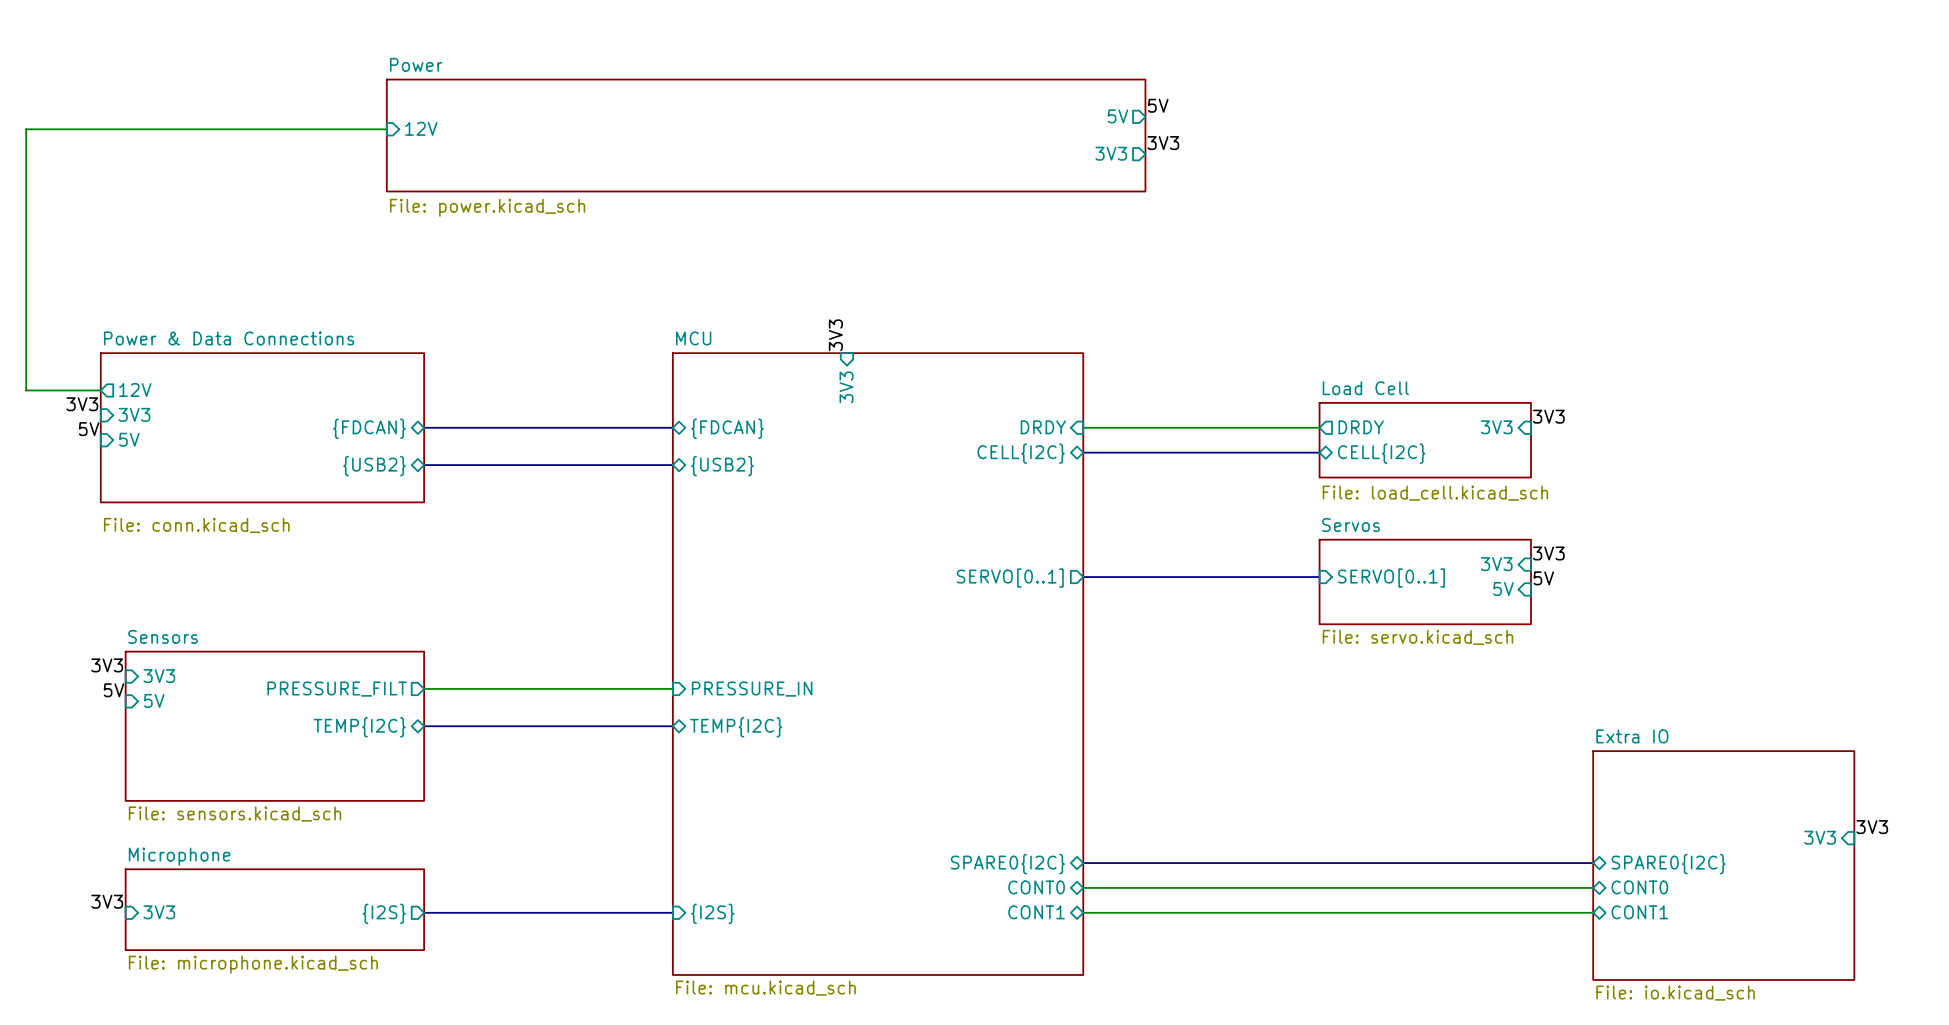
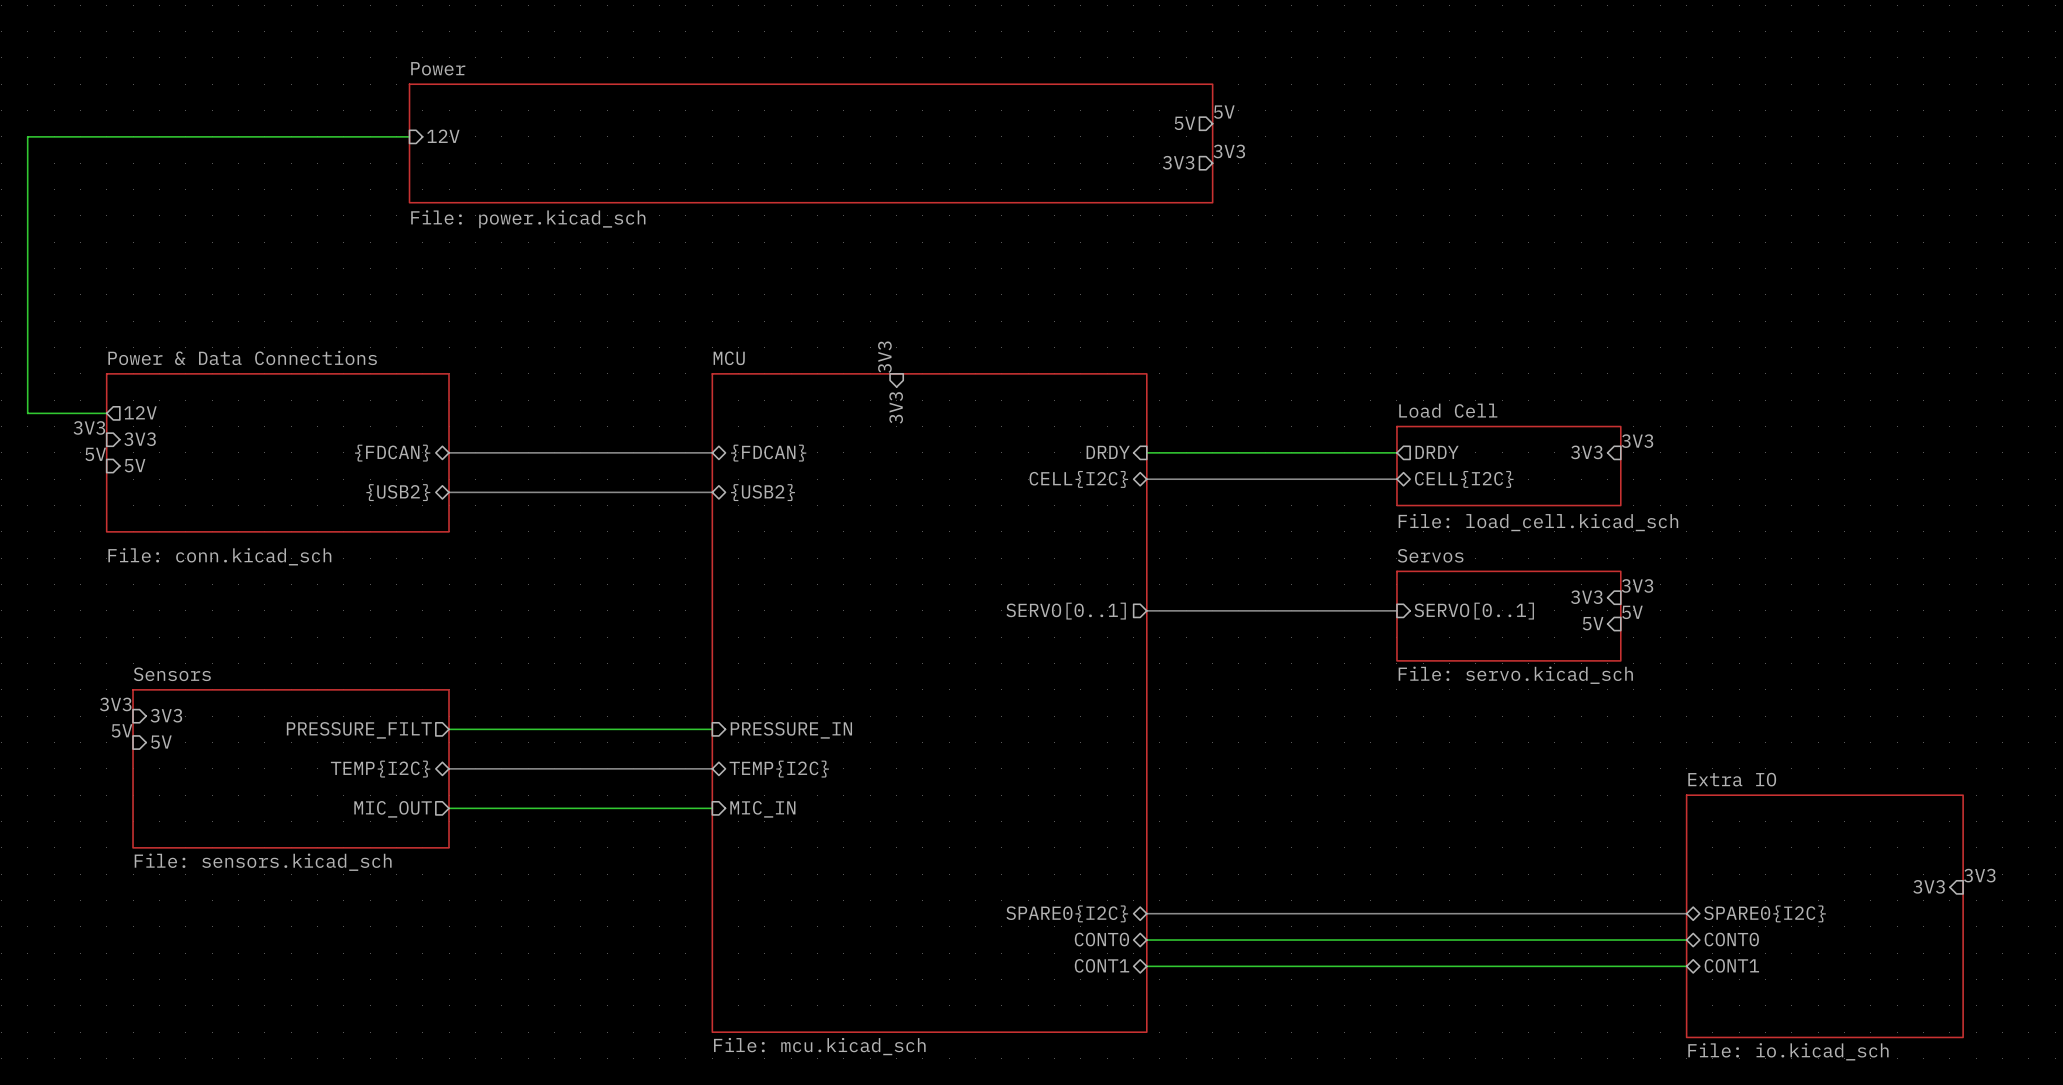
sheet pin: none -> MIC_OUT (393, 809)
wire: none -> (449, 808) (712, 808)
sheet pin: none -> MIC_IN (762, 809)
label: 3V3 (107, 901) -> none
sheet Microphone: File: microphone.kicad_sch (274, 909) -> none
sheet pin: 3V3 (159, 912) -> none
bus: (424, 912) (672, 912) -> none
sheet pin: {I2S} (384, 913) -> none
sheet pin: {I2S} (712, 913) -> none

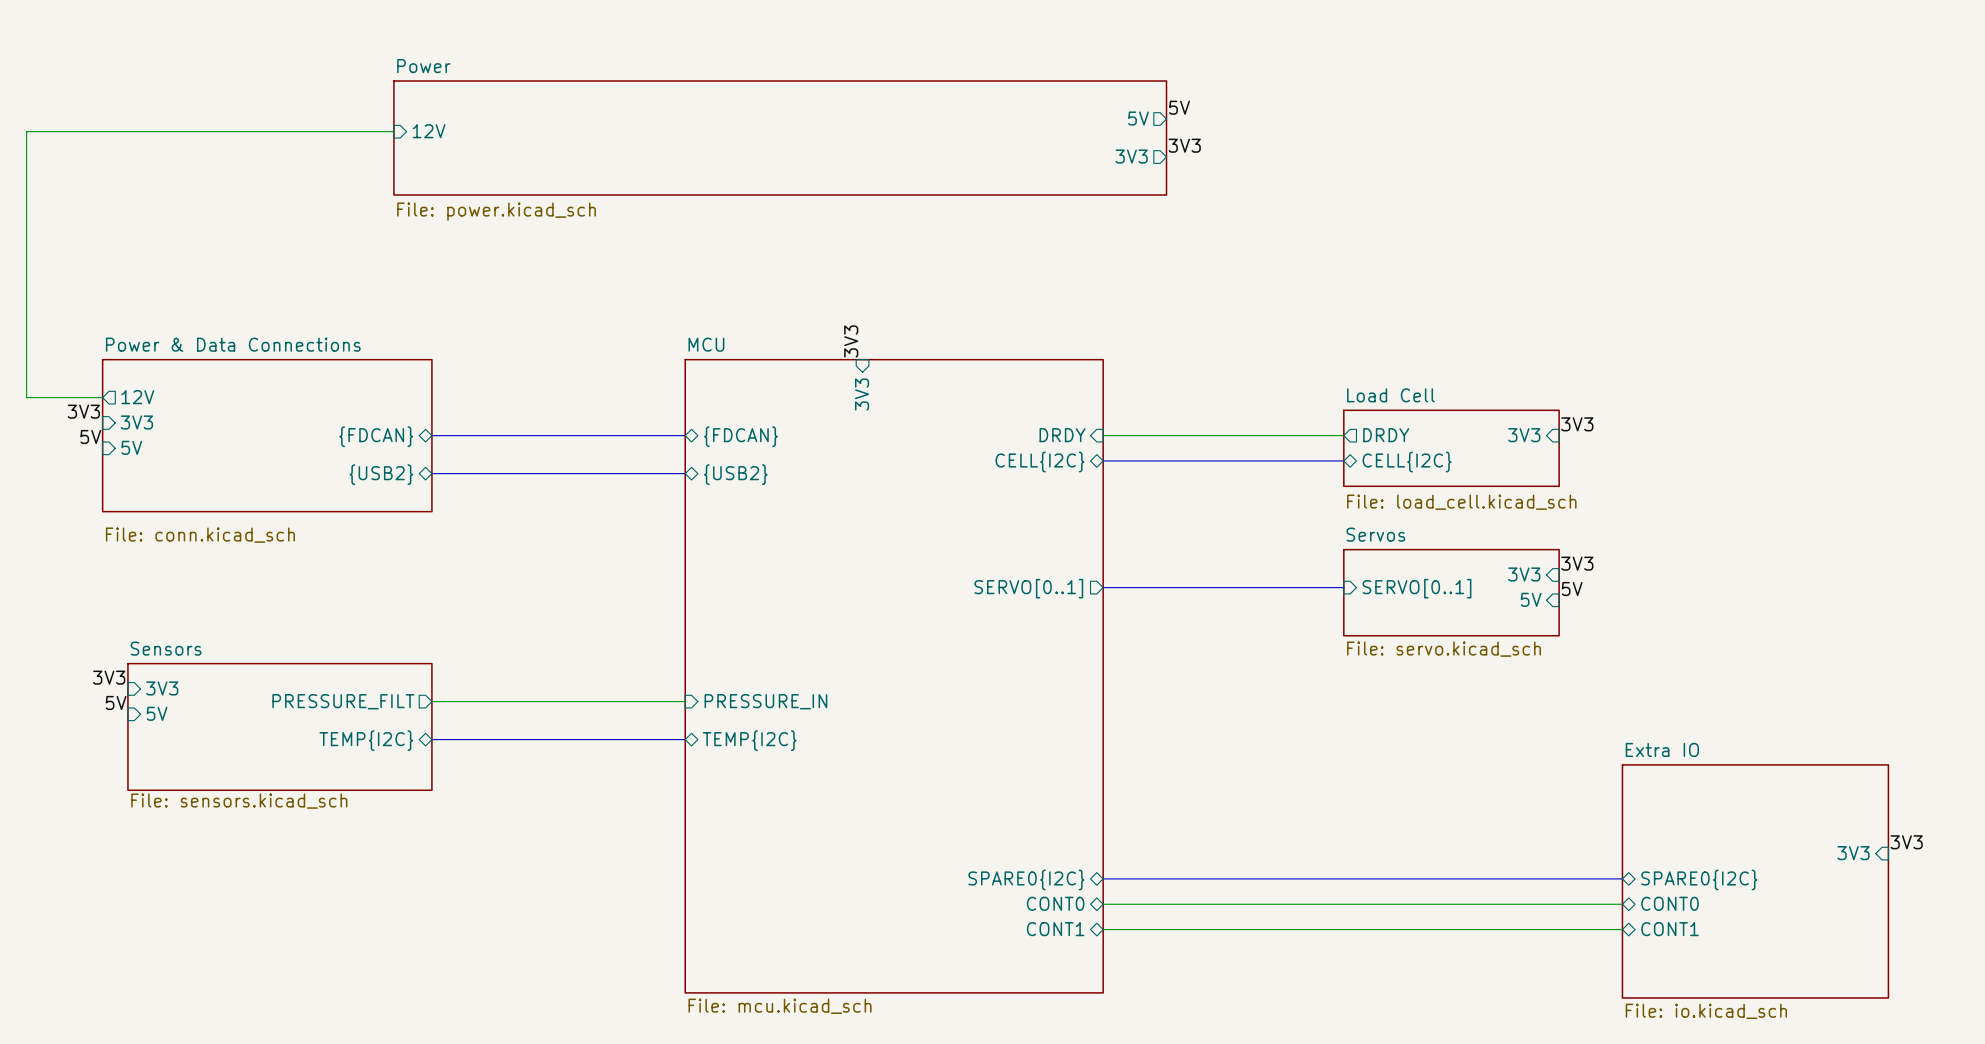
sheet Sensors: none -> File: sensors.kicad_sch (279, 726)
sheet Sensors: File: sensors.kicad_sch (291, 768) -> none
wire: (449, 808) (712, 808) -> none
sheet pin: MIC_OUT (393, 809) -> none
sheet pin: MIC_IN (762, 809) -> none

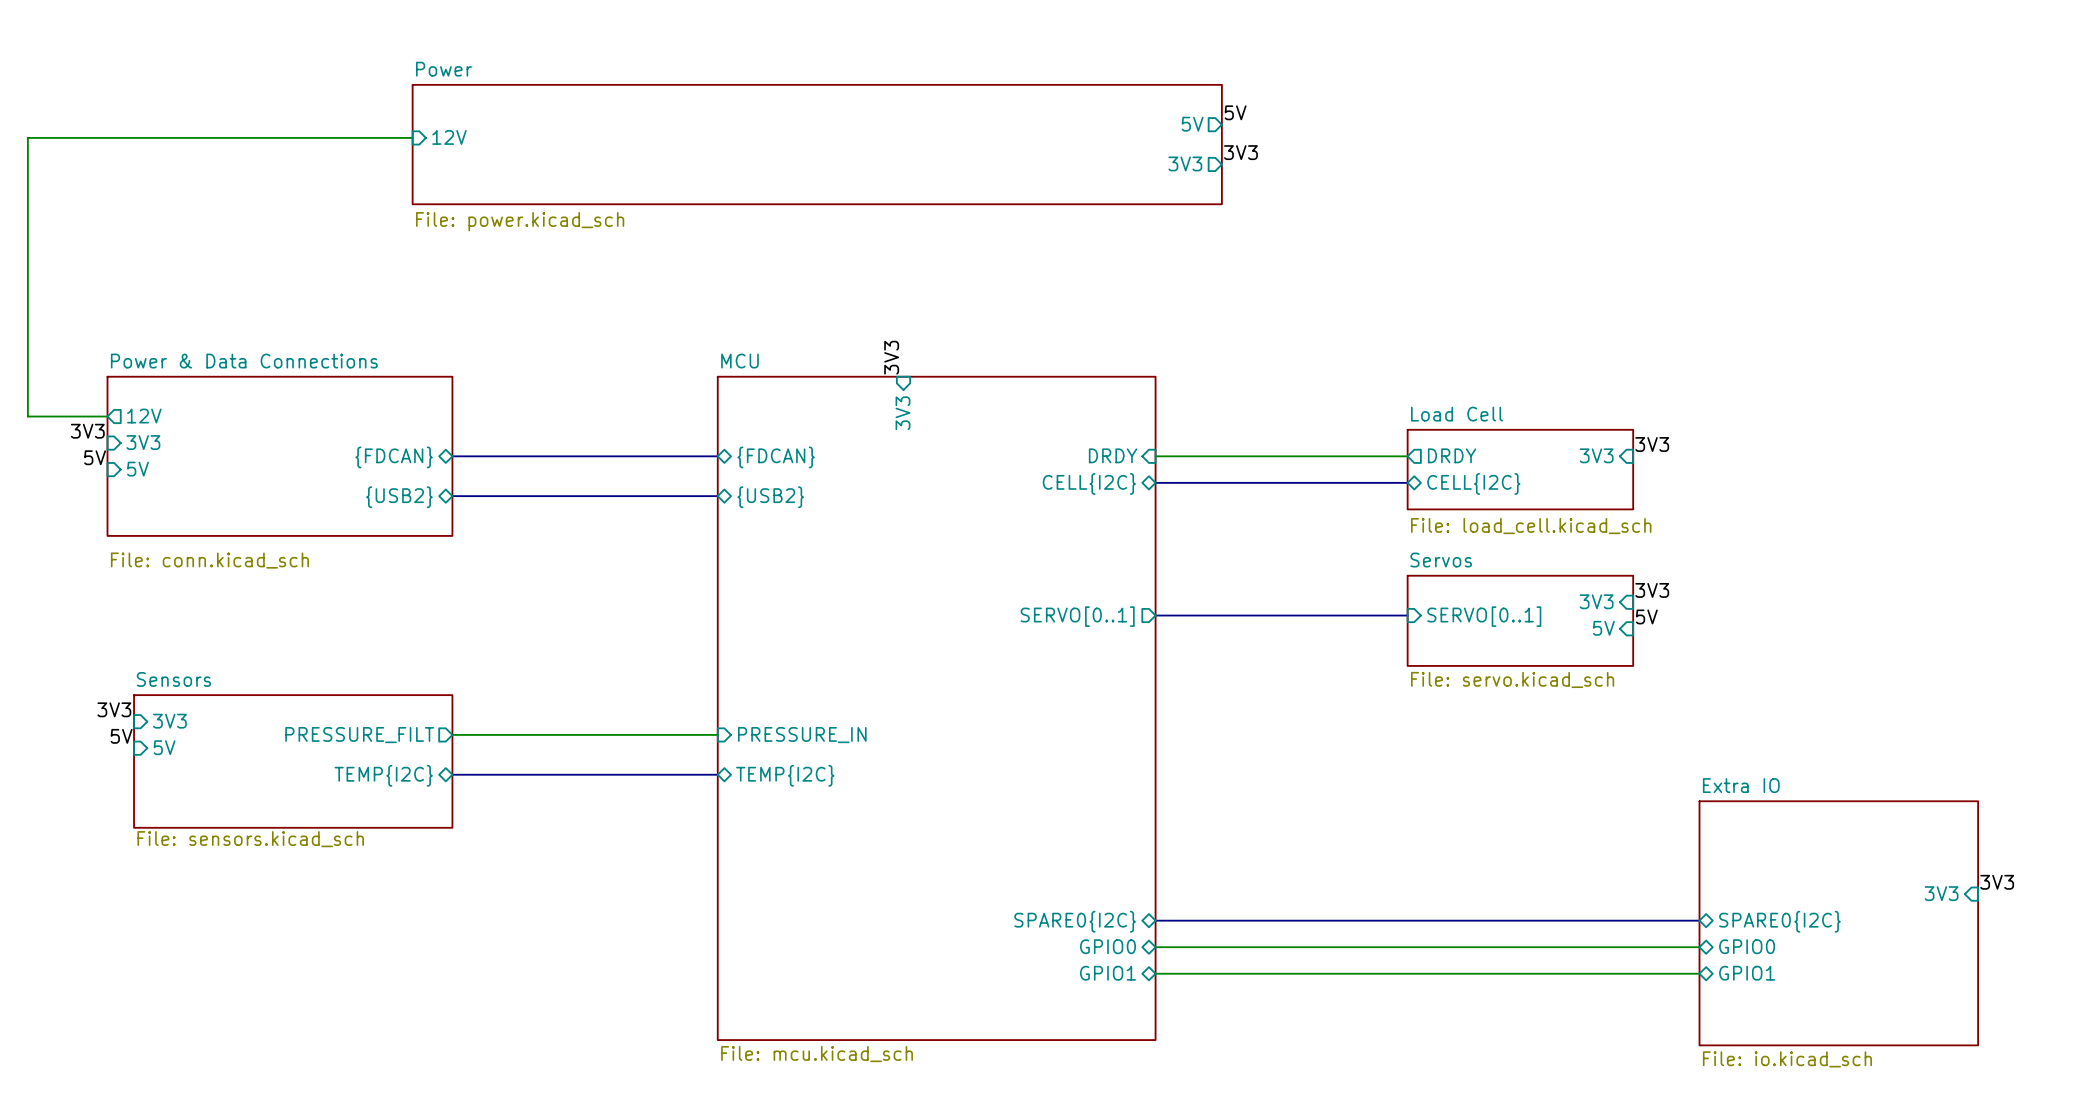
sheet pin: CONT0 (1055, 903) -> GPIO0 (1107, 946)
sheet pin: CONT0 (1669, 903) -> GPIO0 (1747, 946)
sheet pin: CONT1 (1055, 929) -> GPIO1 (1107, 973)
sheet pin: CONT1 (1669, 929) -> GPIO1 (1747, 973)

